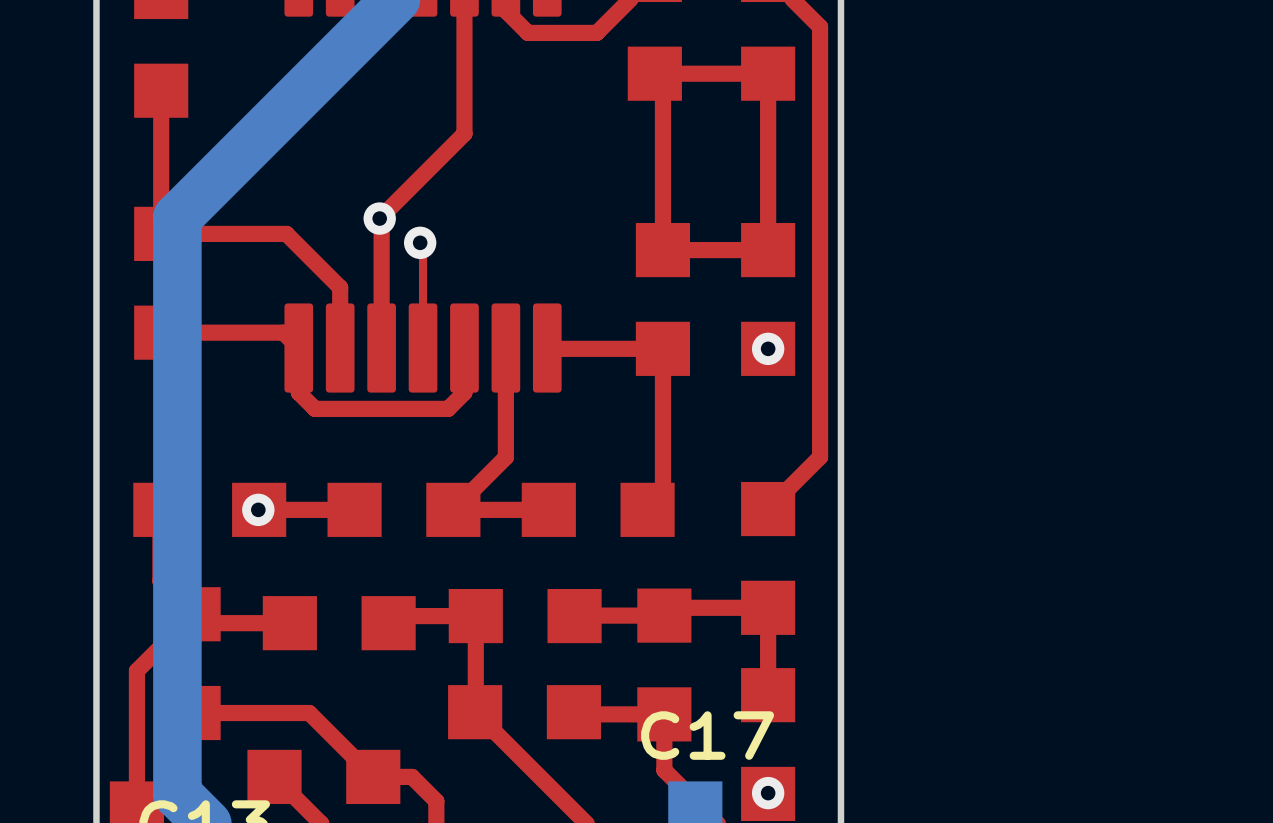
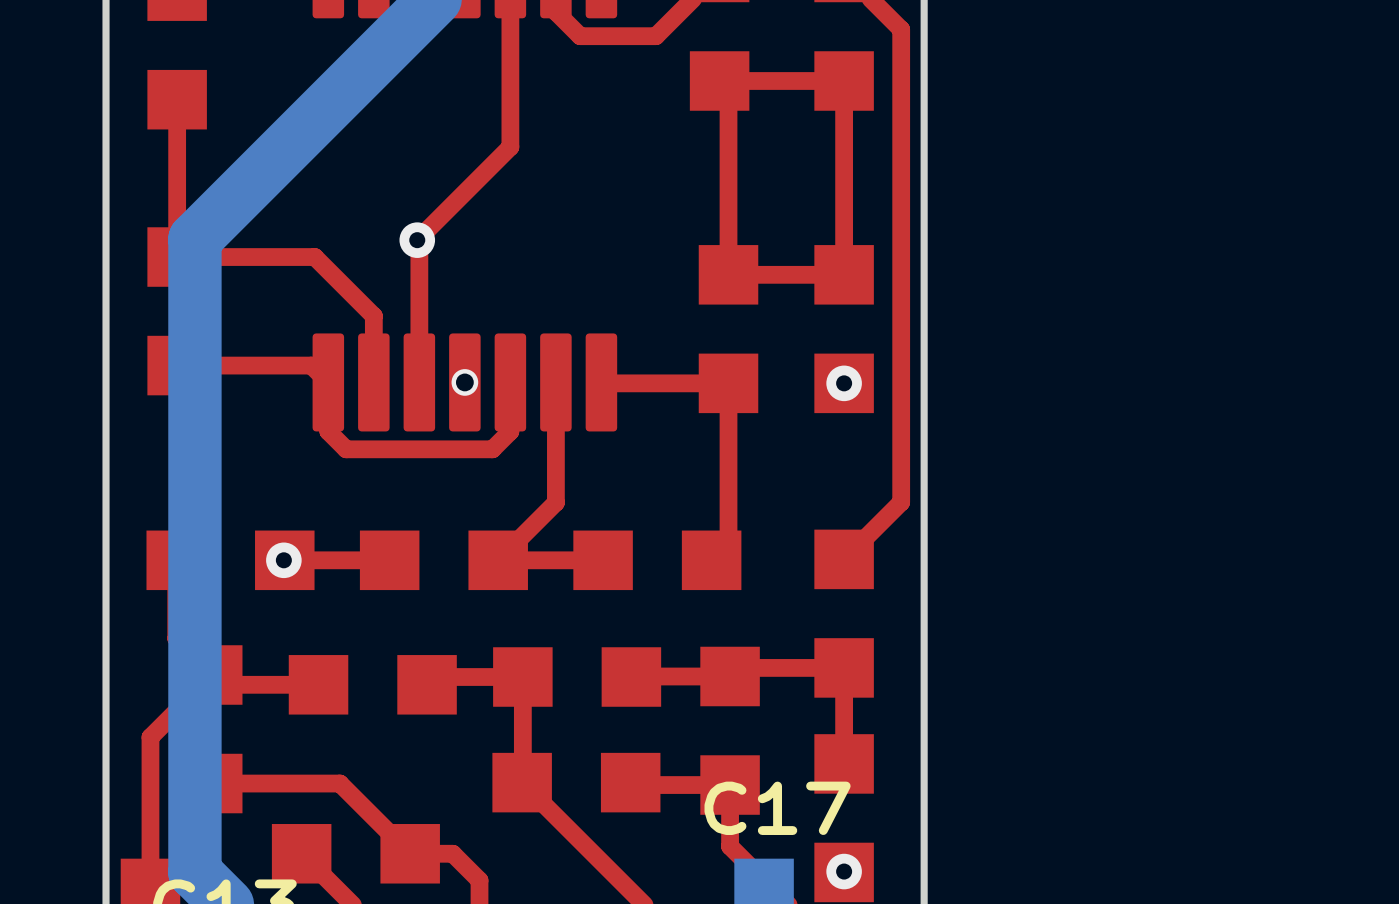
top track: (420, 242) (423, 245) (423, 348) -> none
via: (420, 242) -> none
via: none -> (464, 382)

